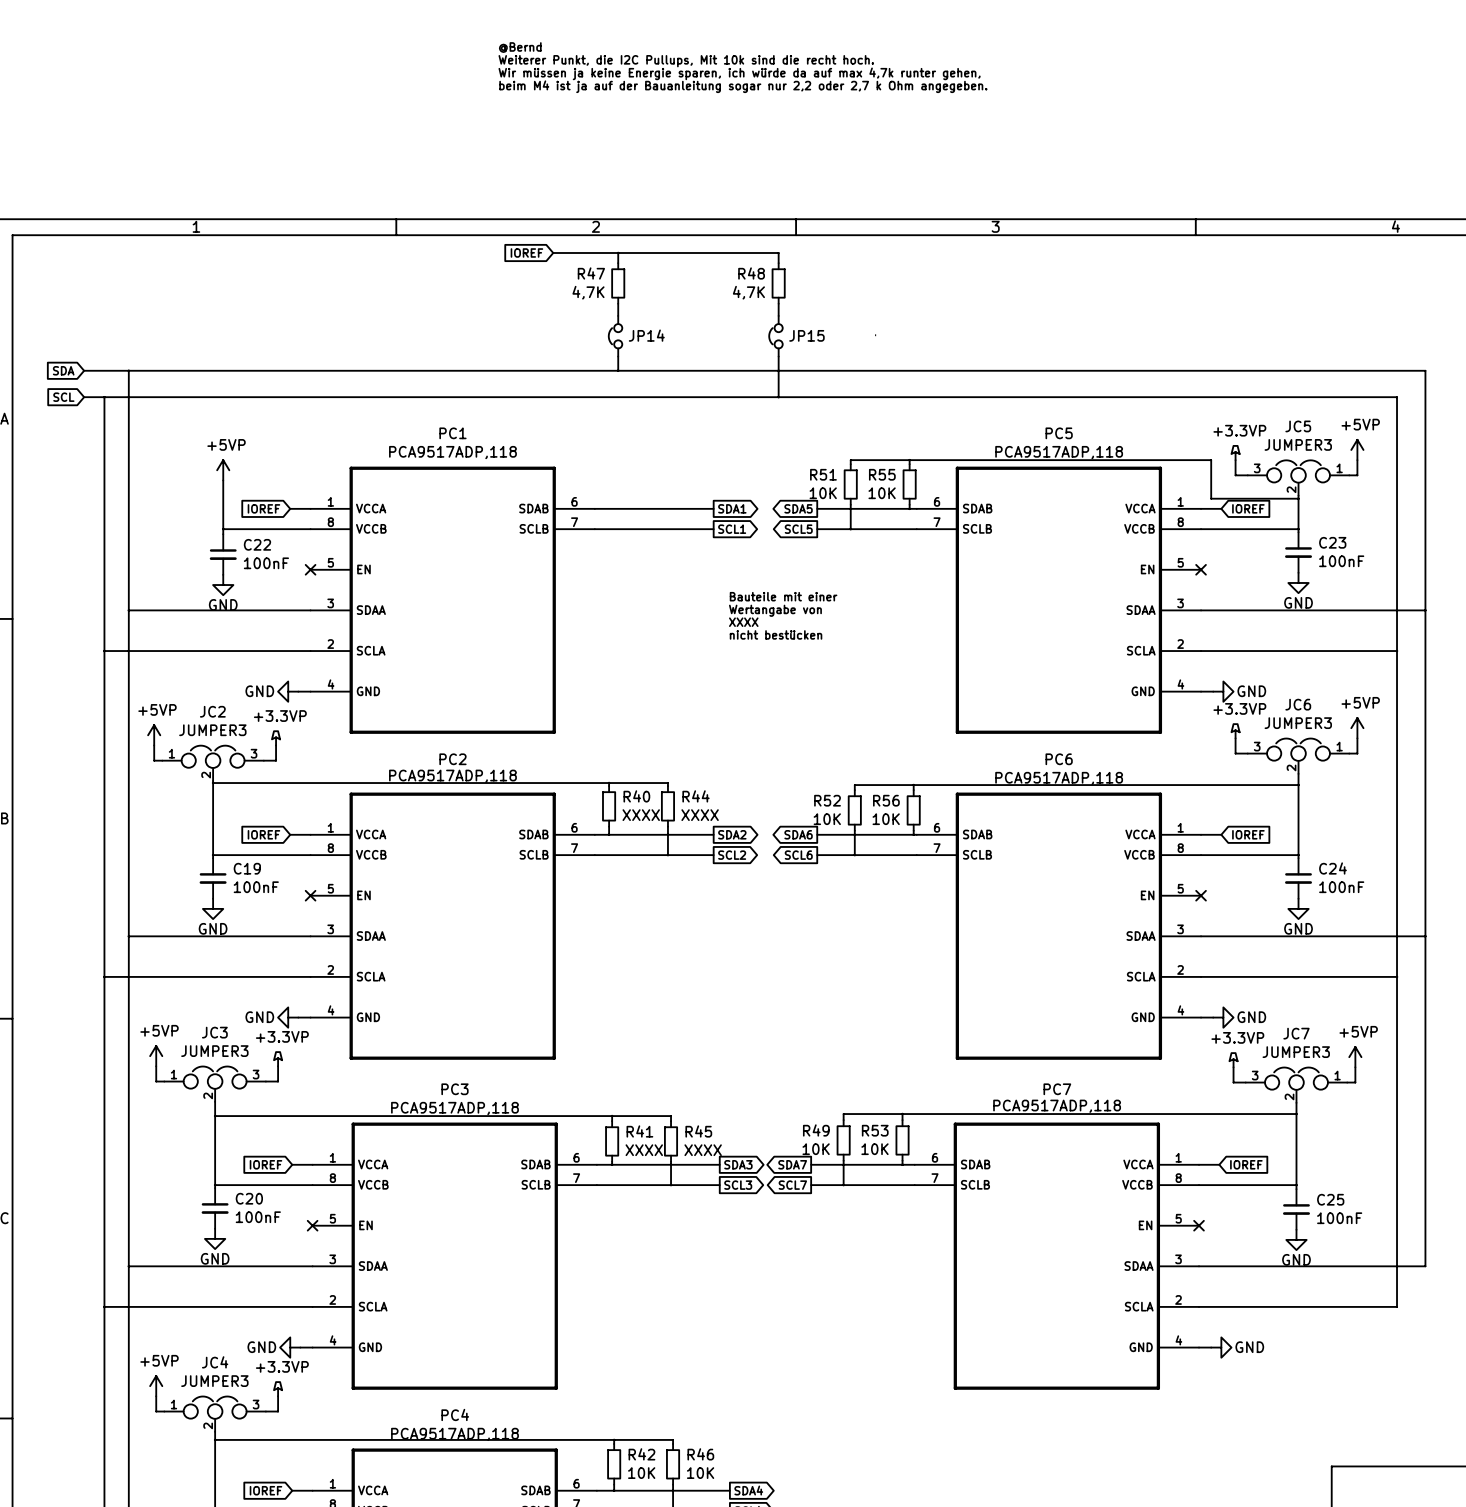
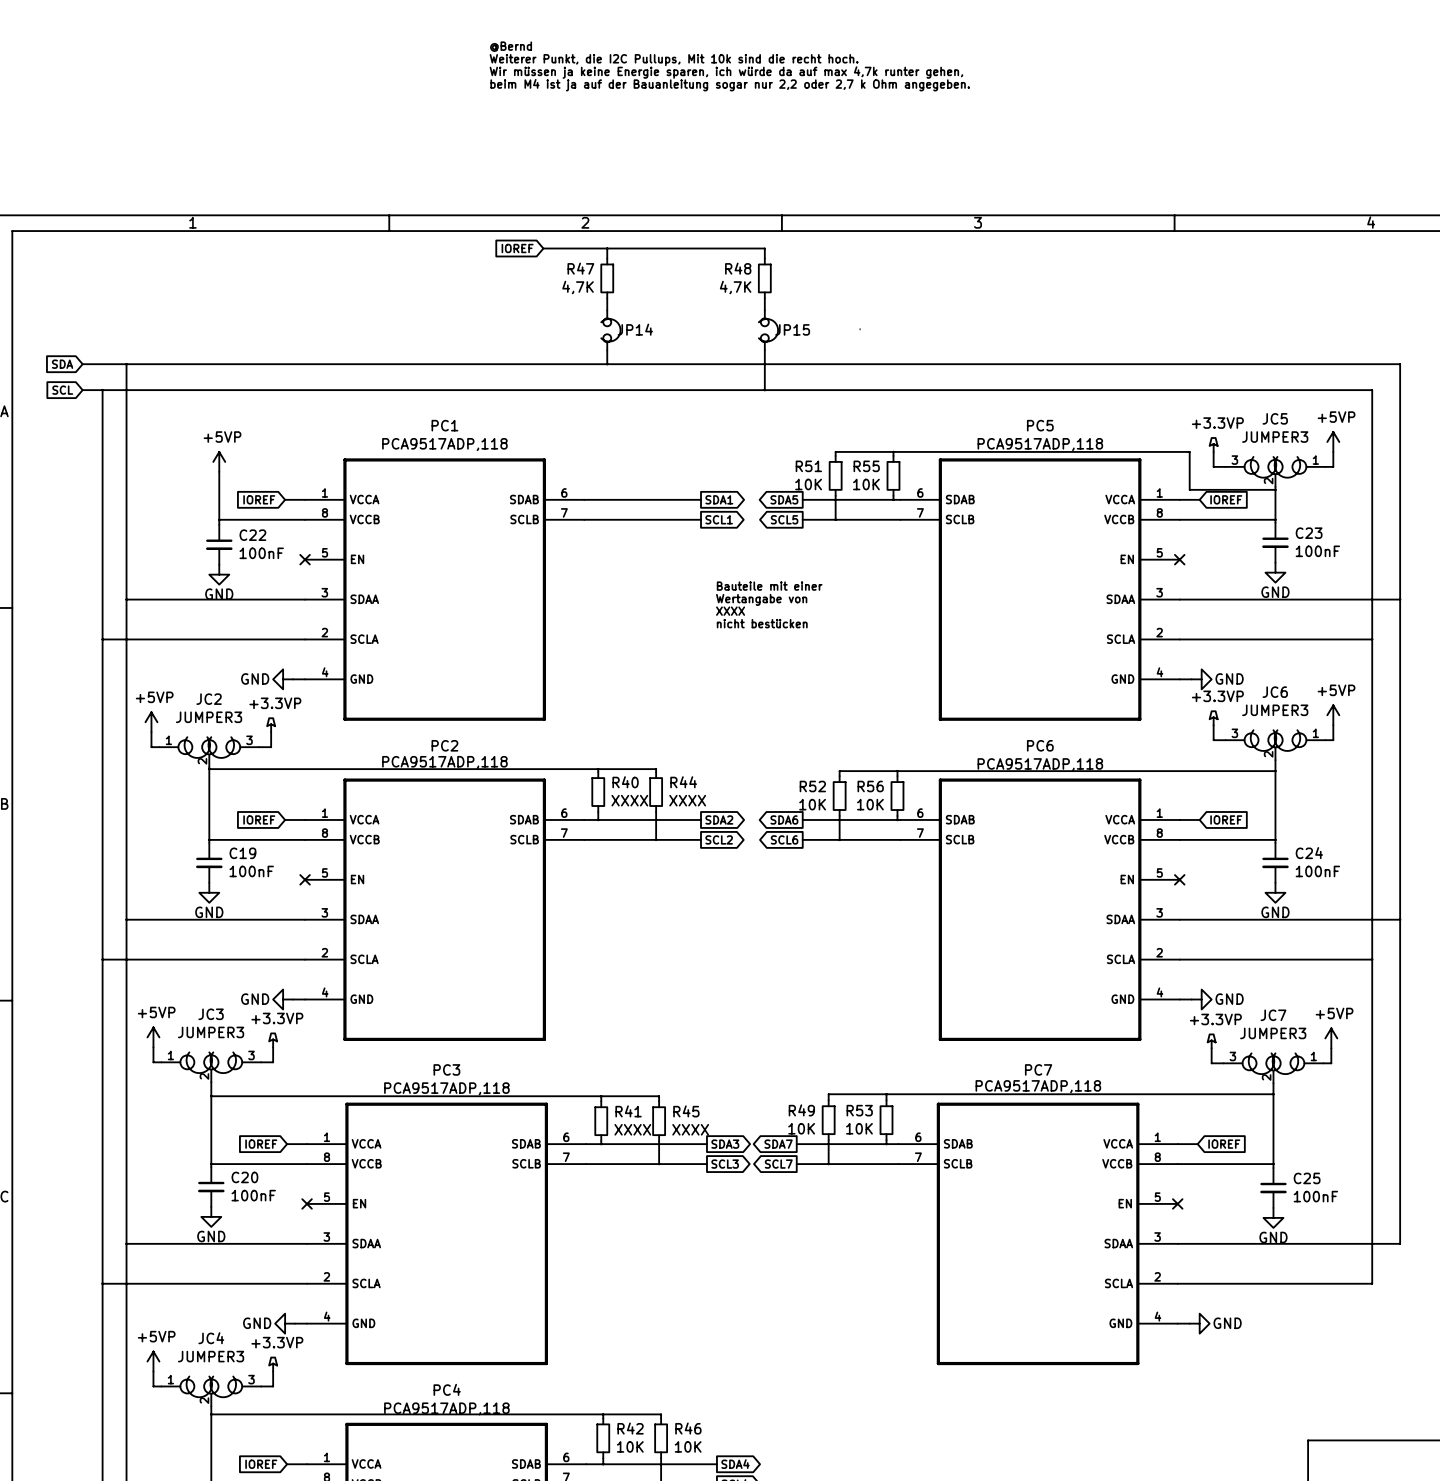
JP14 symbol: [608, 315, 623, 357] -> [601, 310, 621, 351]
JP15 symbol: [769, 315, 783, 357] -> [758, 310, 779, 351]
JC5 symbol: [1247, 460, 1350, 496] -> [1225, 456, 1326, 487]
JC6 symbol: [1247, 738, 1350, 774] -> [1225, 730, 1326, 761]
JC2 symbol: [162, 745, 264, 781] -> [159, 737, 260, 768]
JC3 symbol: [164, 1066, 266, 1102] -> [161, 1052, 262, 1083]
JC7 symbol: [1245, 1067, 1348, 1103] -> [1223, 1053, 1324, 1084]
JC4 symbol: [164, 1396, 266, 1432] -> [161, 1376, 262, 1407]

